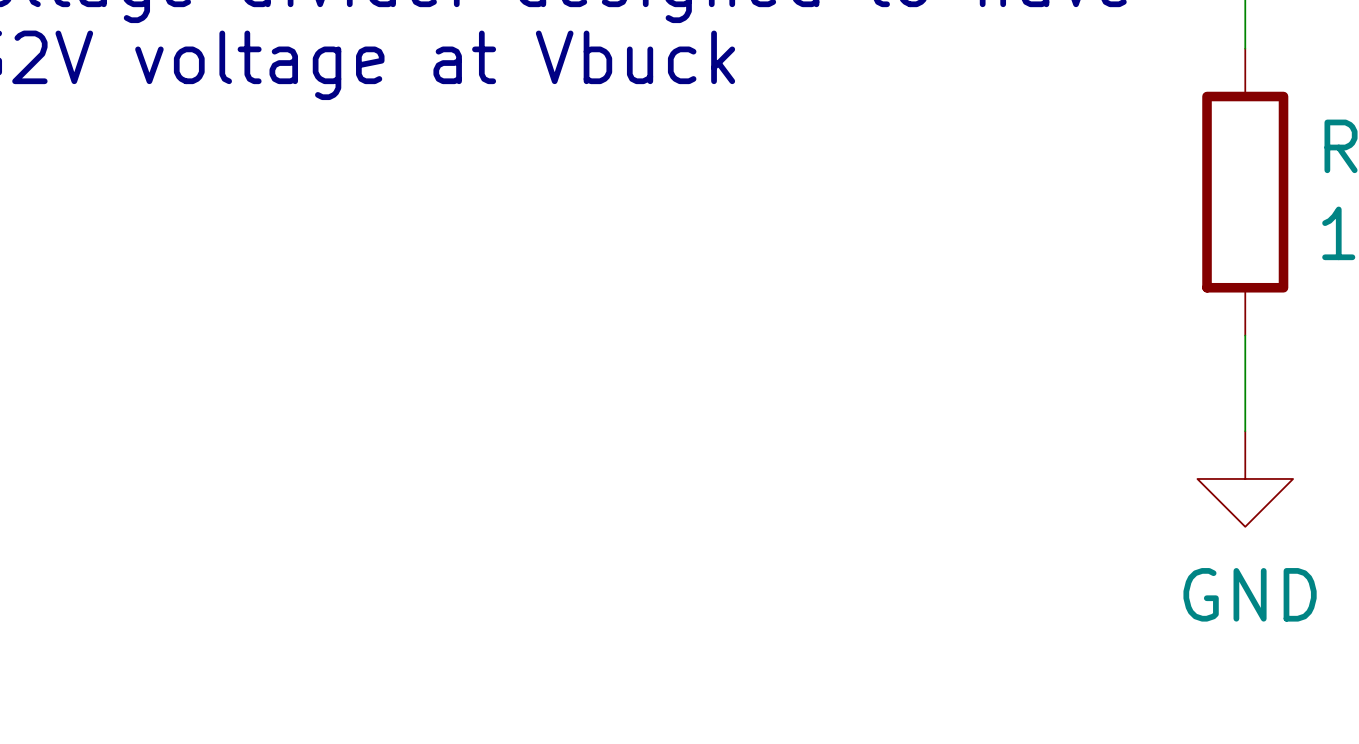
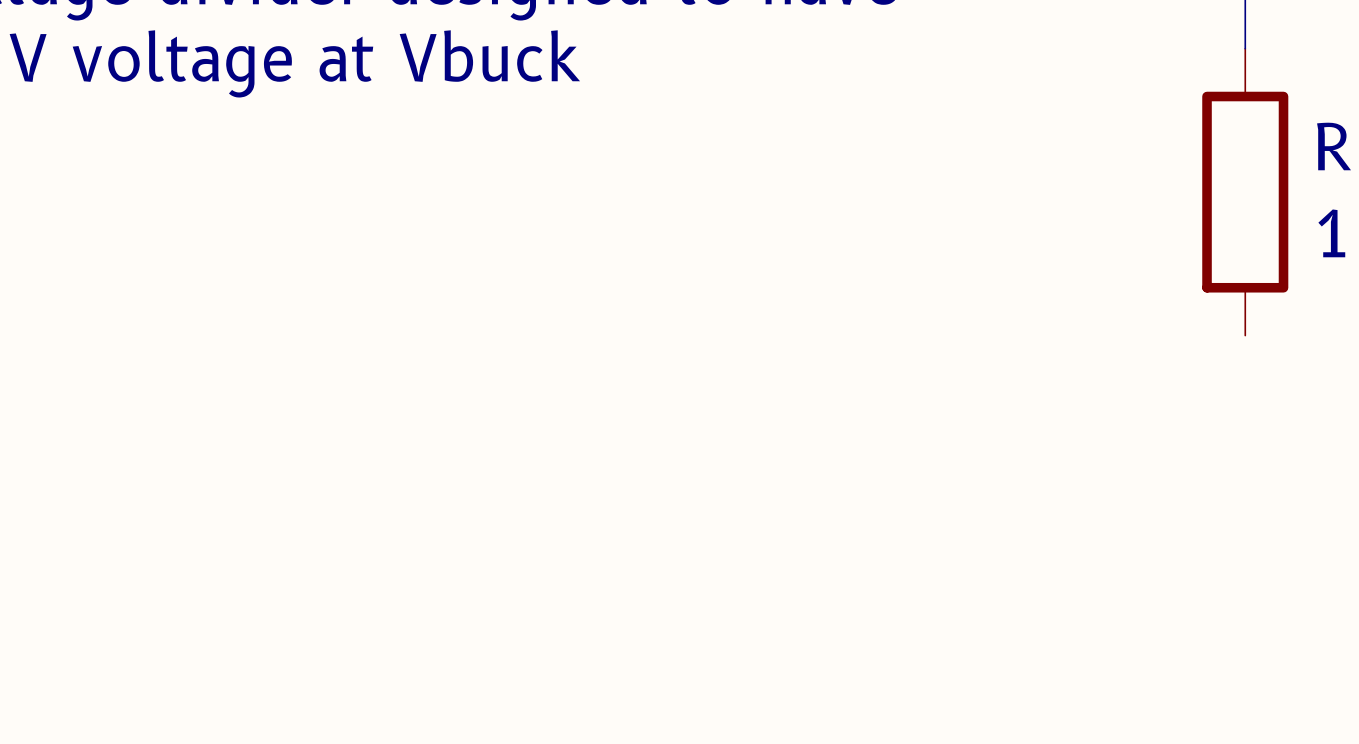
wire: (1245, 335) (1245, 431) -> none
power symbol: GND (1245, 478) -> none

